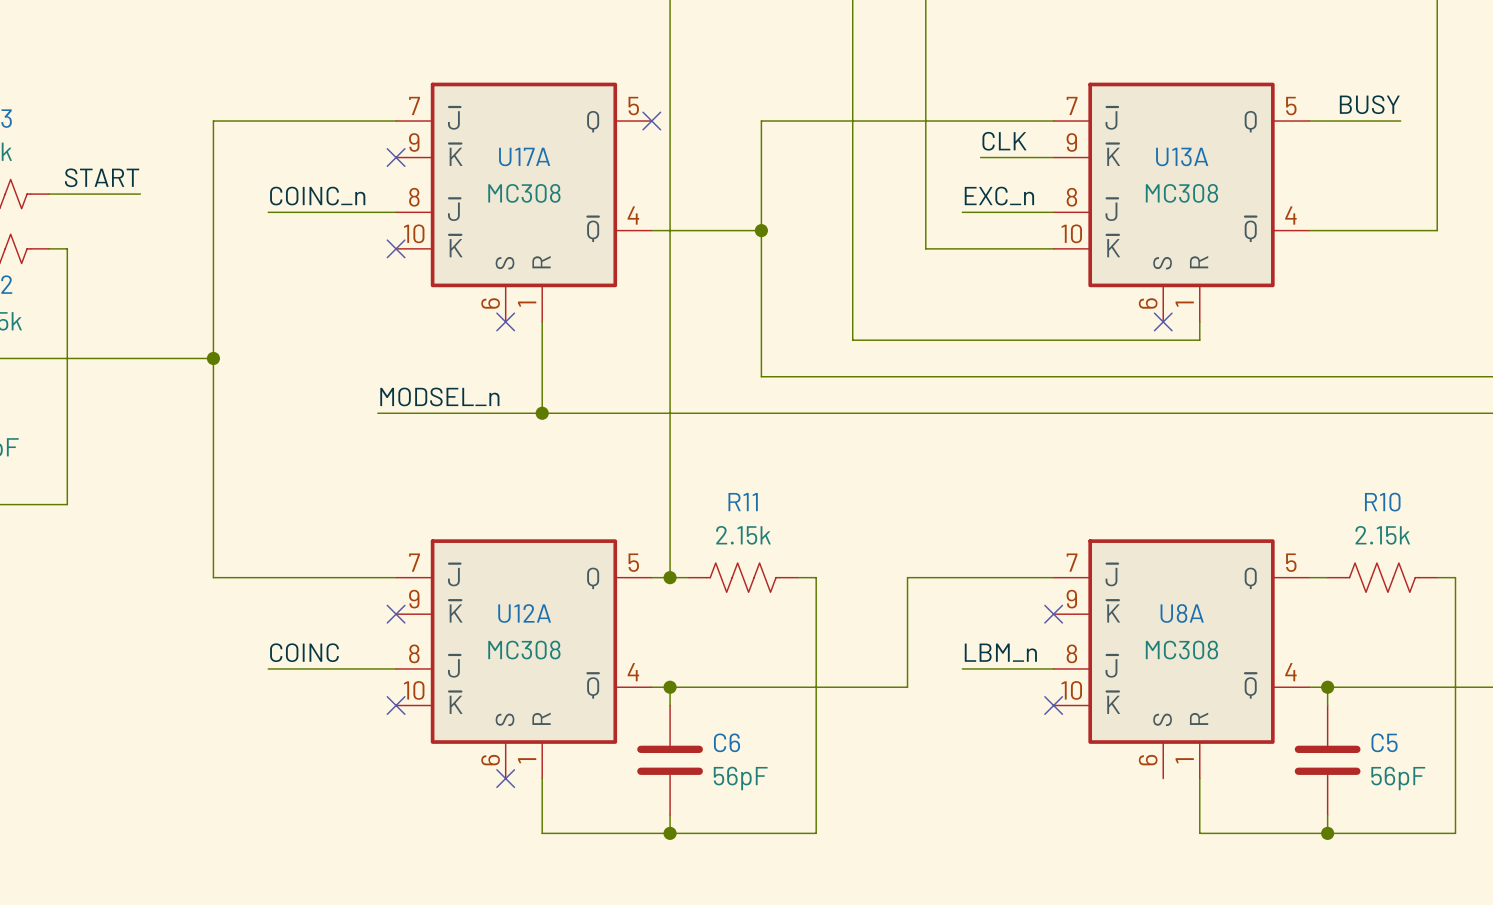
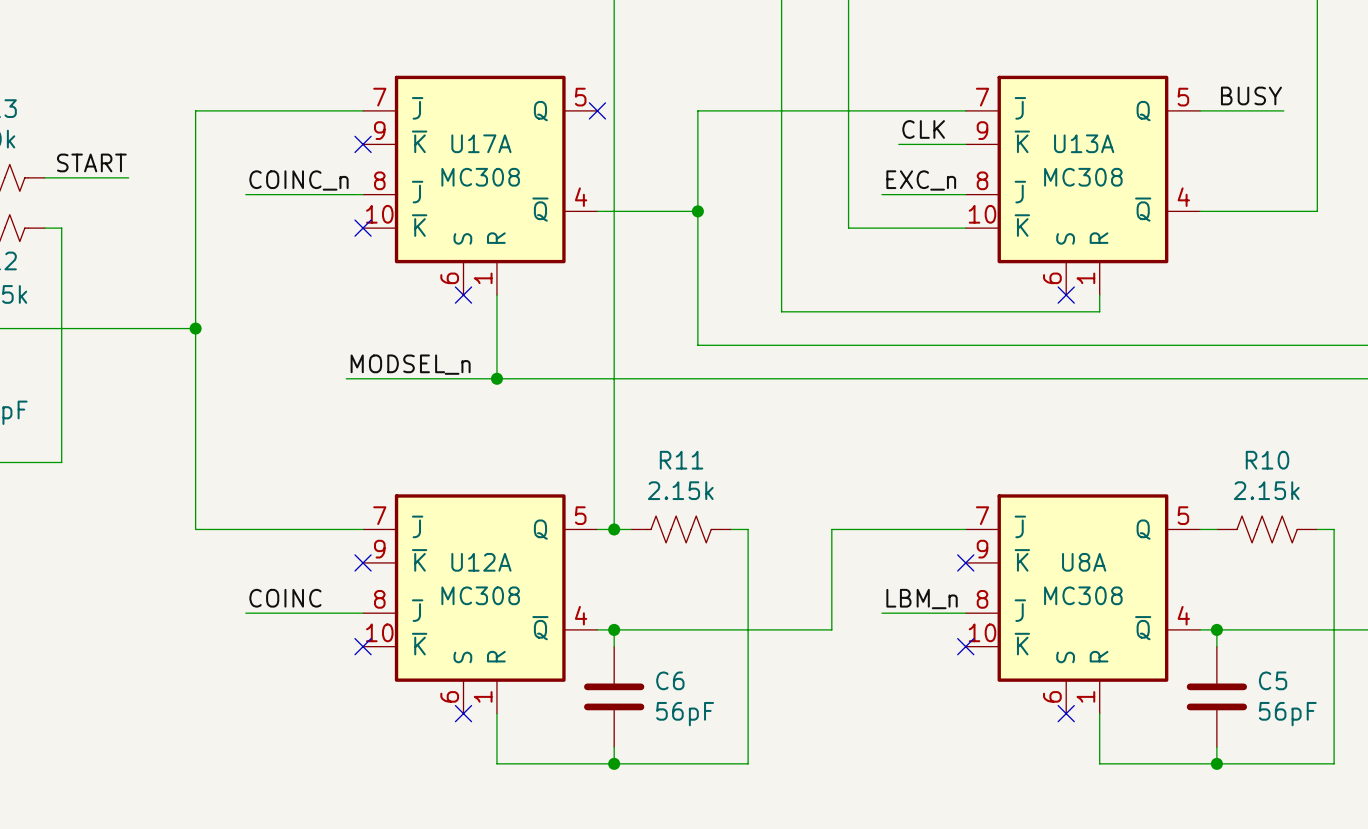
no-connect mark: none -> (1066, 713)

